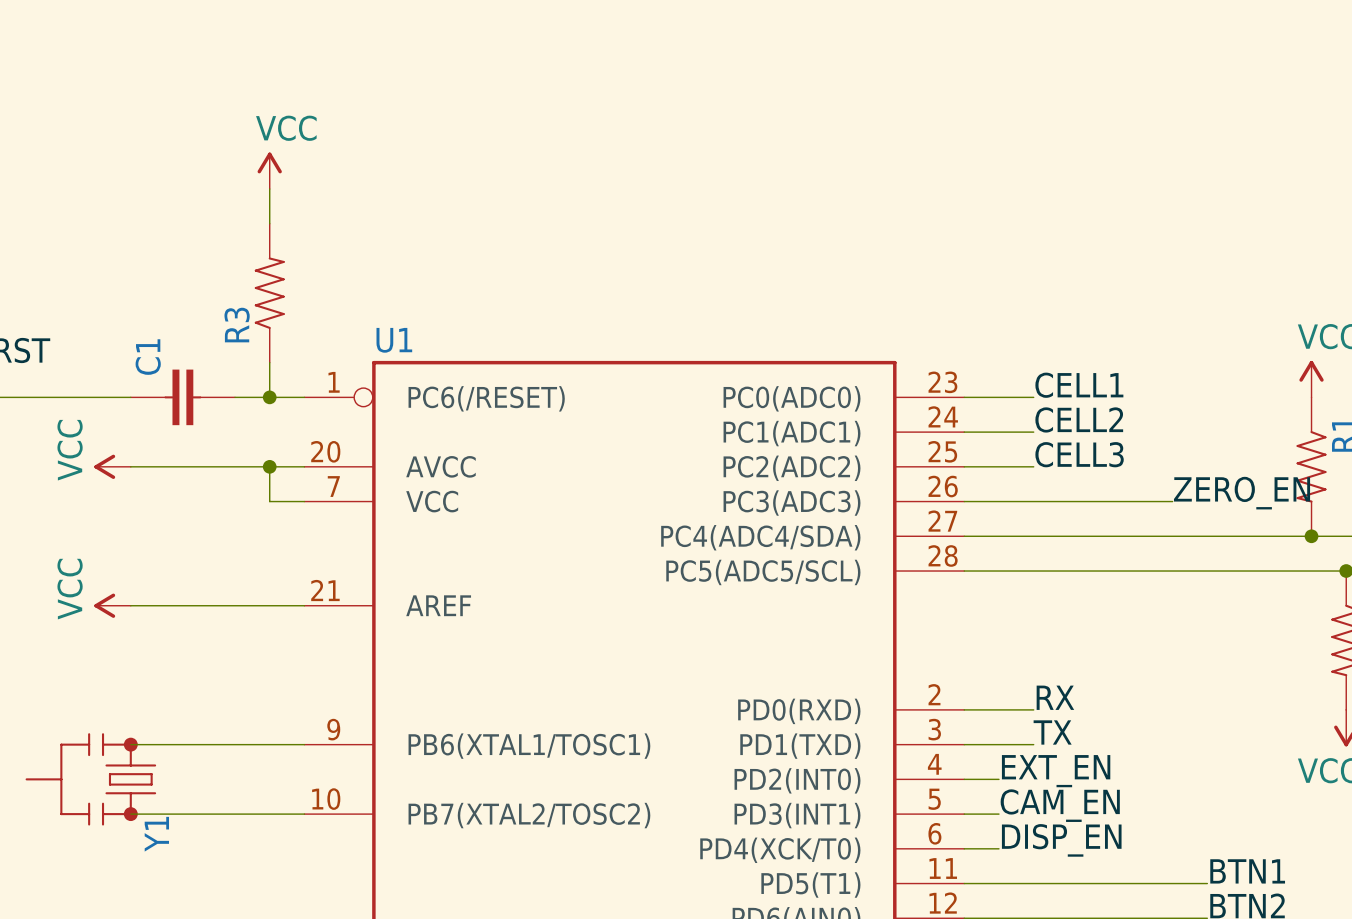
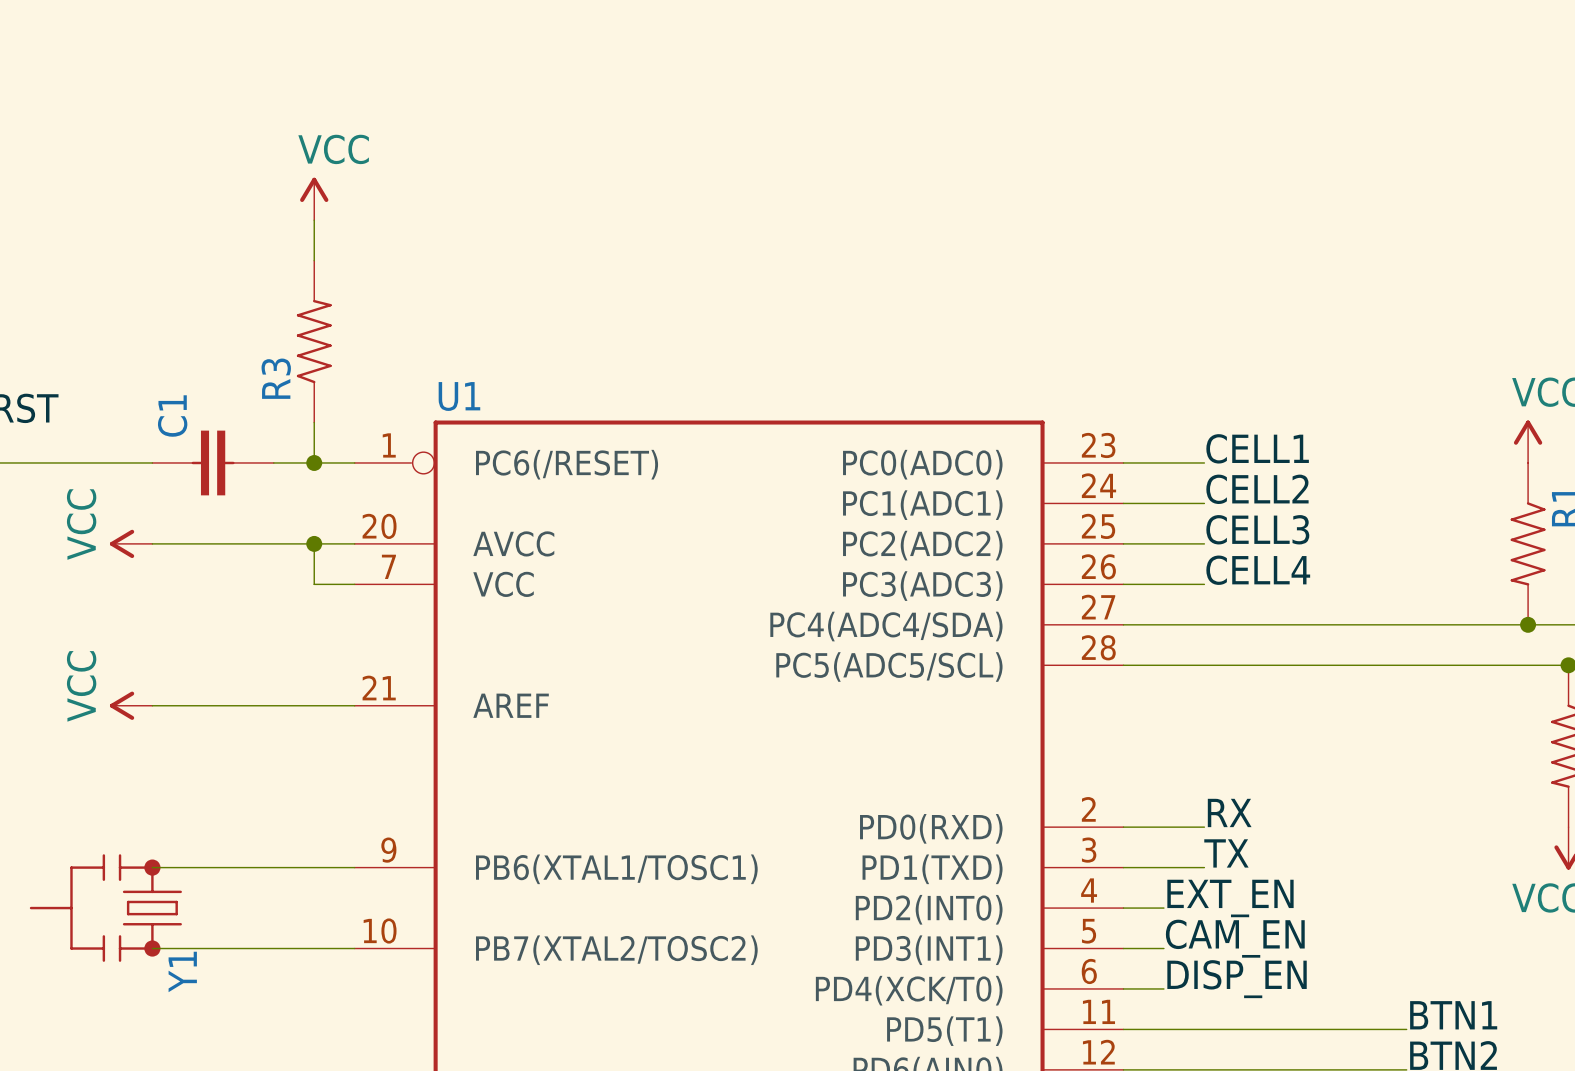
label: none -> CELL4 (1258, 570)
label: ZERO_EN (1242, 493) -> none
wire: (1033, 501) (1172, 501) -> none

